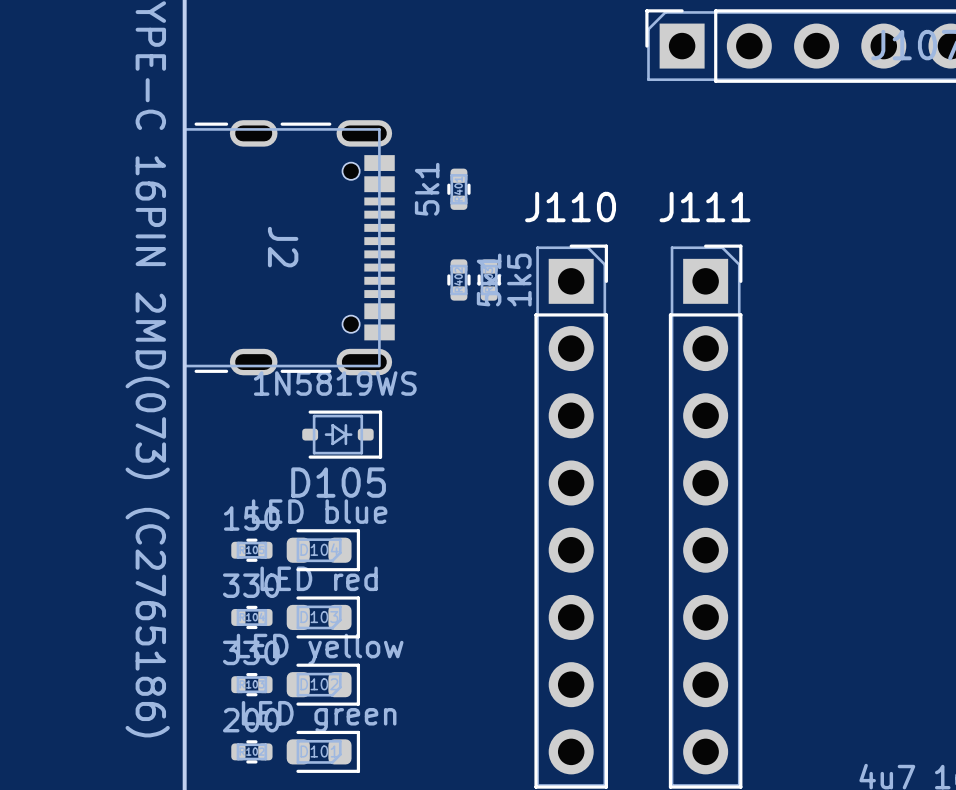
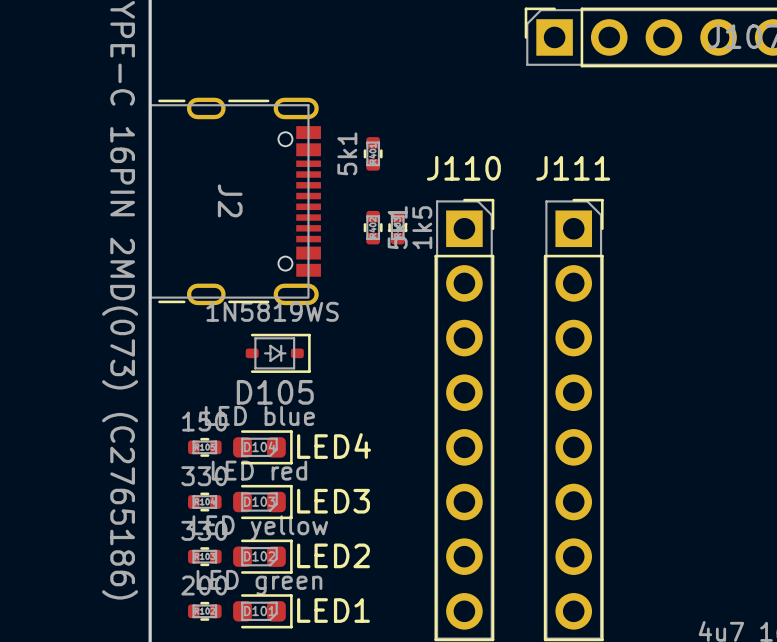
text: none -> LED4 (334, 446)
text: none -> LED3 (333, 501)
text: none -> LED2 (333, 555)
text: none -> LED1 (333, 610)

